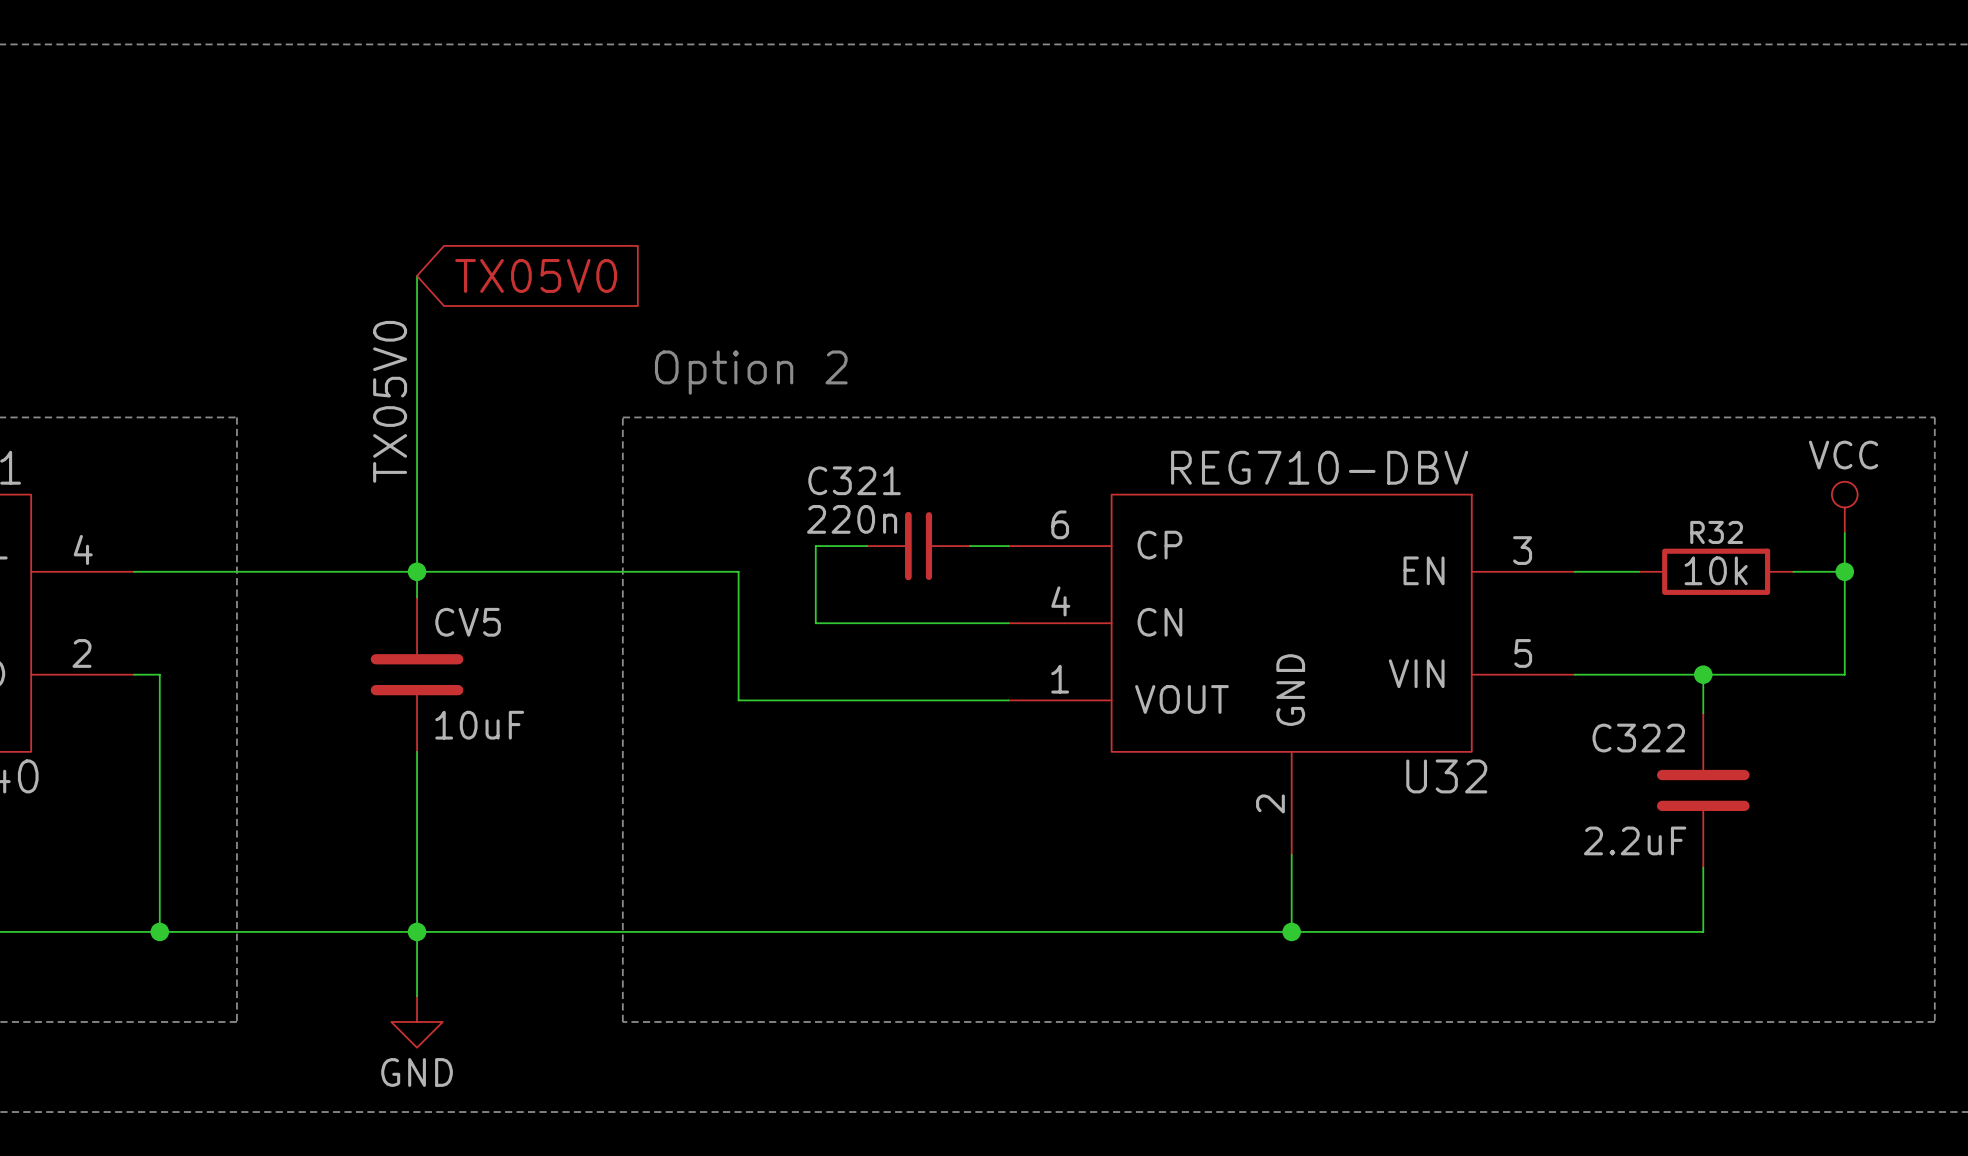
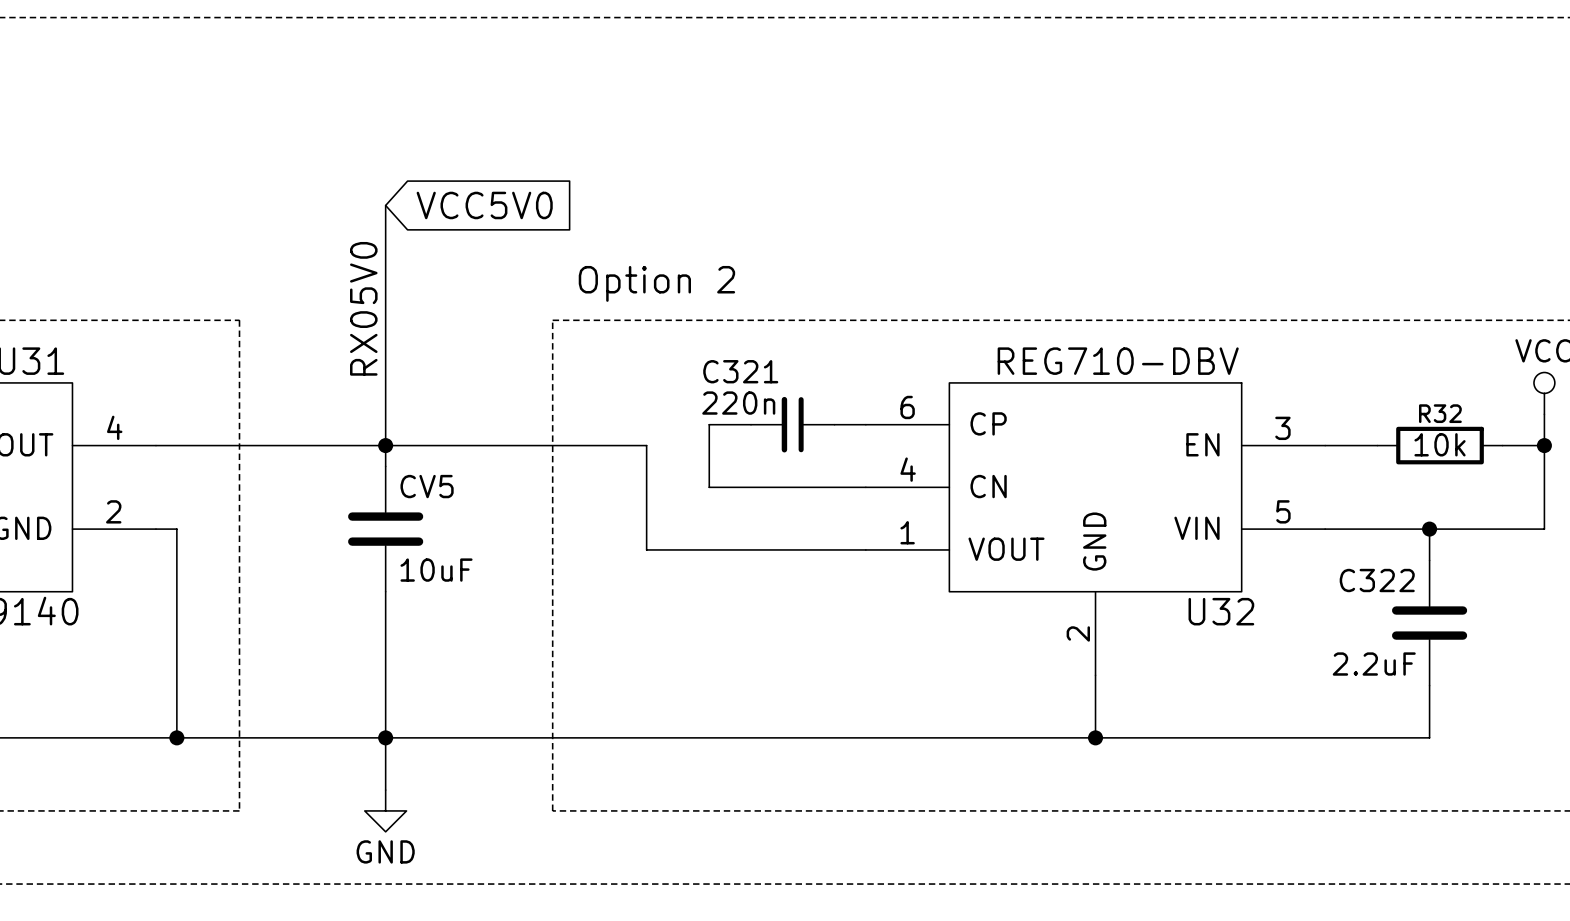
global label: TX05V0 (536, 275) -> VCC5V0 (484, 205)
label: TX05V0 (390, 401) -> RX05V0 (363, 308)

